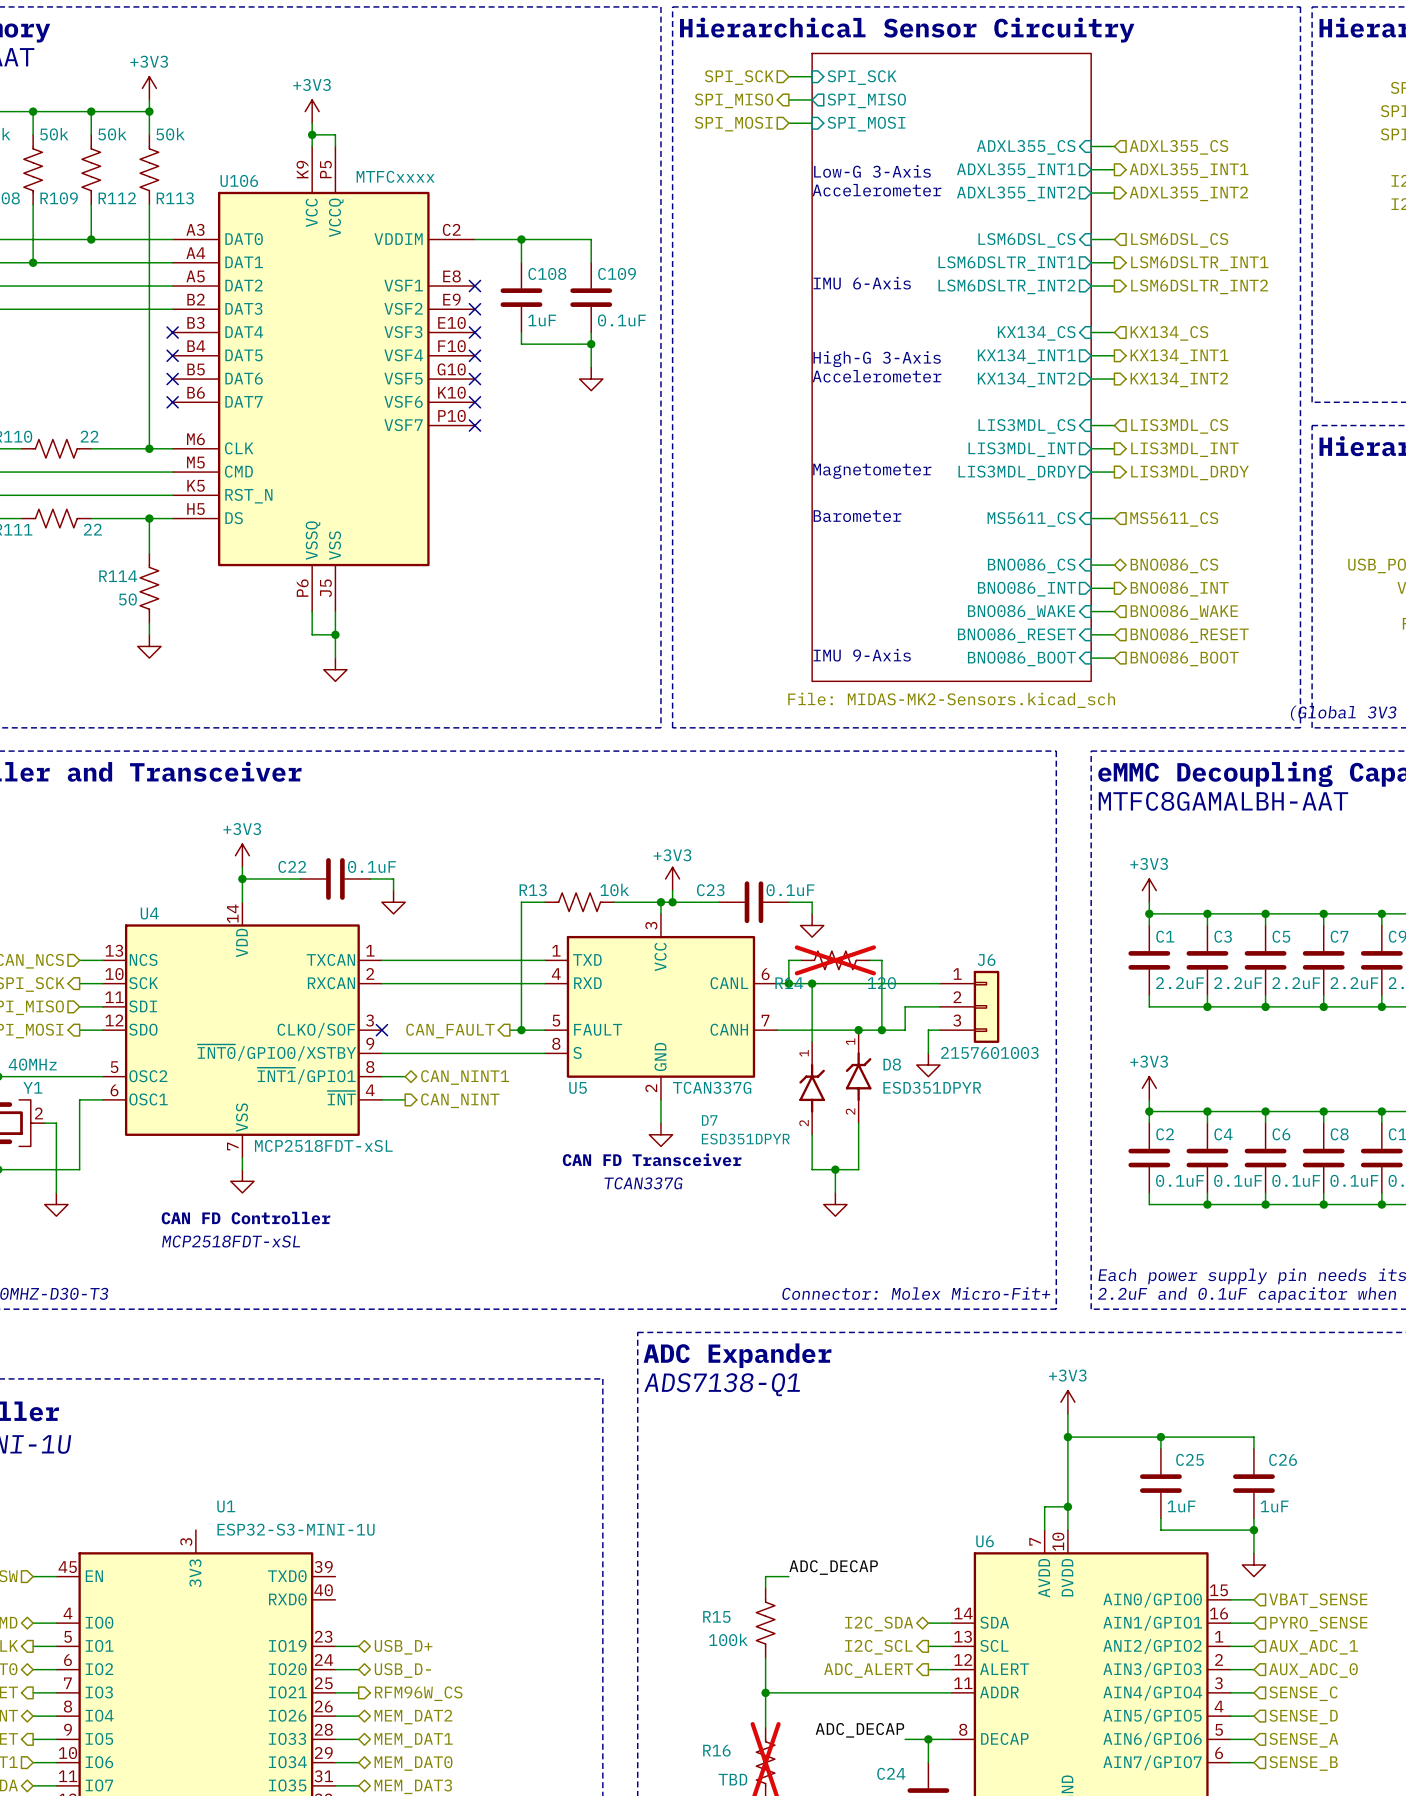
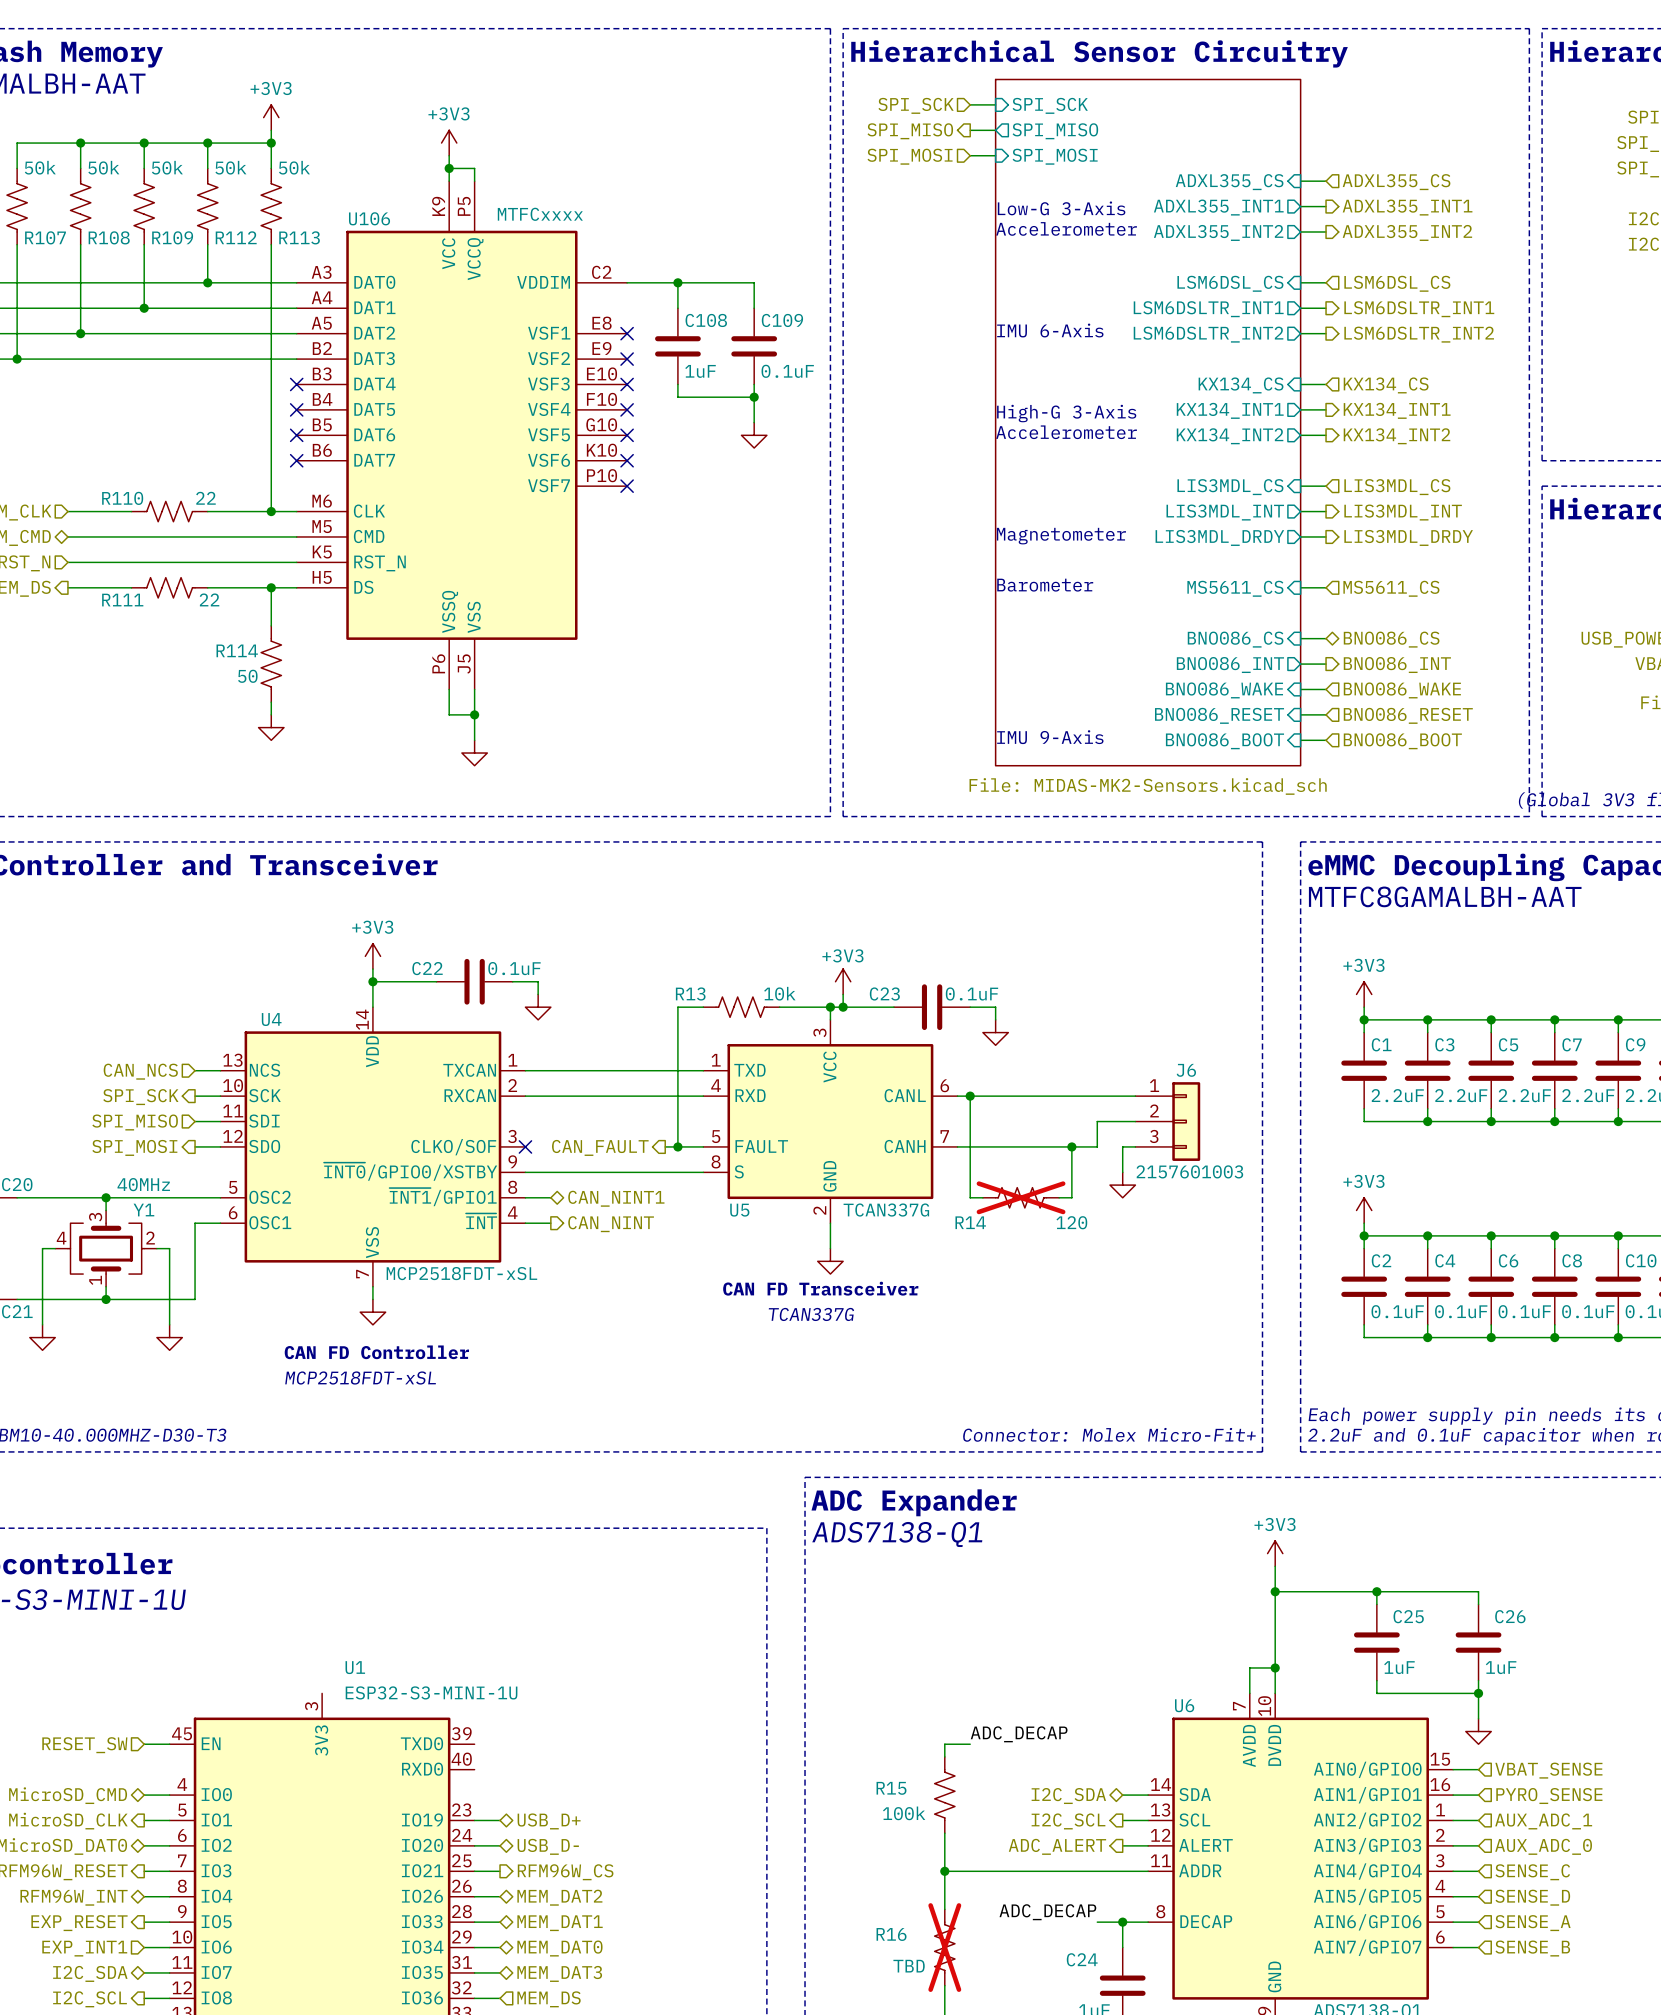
wire: (800, 960) (788, 960) (788, 983) -> (982, 1197) (970, 1197) (970, 1096)
R14 position: (835, 960) -> (1021, 1197)
wire: (870, 960) (881, 960) (881, 1030) -> (1059, 1197) (1071, 1197) (1071, 1146)
wire: (812, 983) (812, 1041) -> none
junction: (812, 983) -> none
junction: (858, 1030) -> none
D8: ESD351DPYR (858, 1076) -> none
D7: ESD351DPYR (812, 1088) -> none
wire: (858, 1123) (858, 1169) (812, 1169) (812, 1134) -> none
wire: (835, 1169) (835, 1192) -> none
junction: (835, 1169) -> none
power symbol: (835, 1204) -> none

